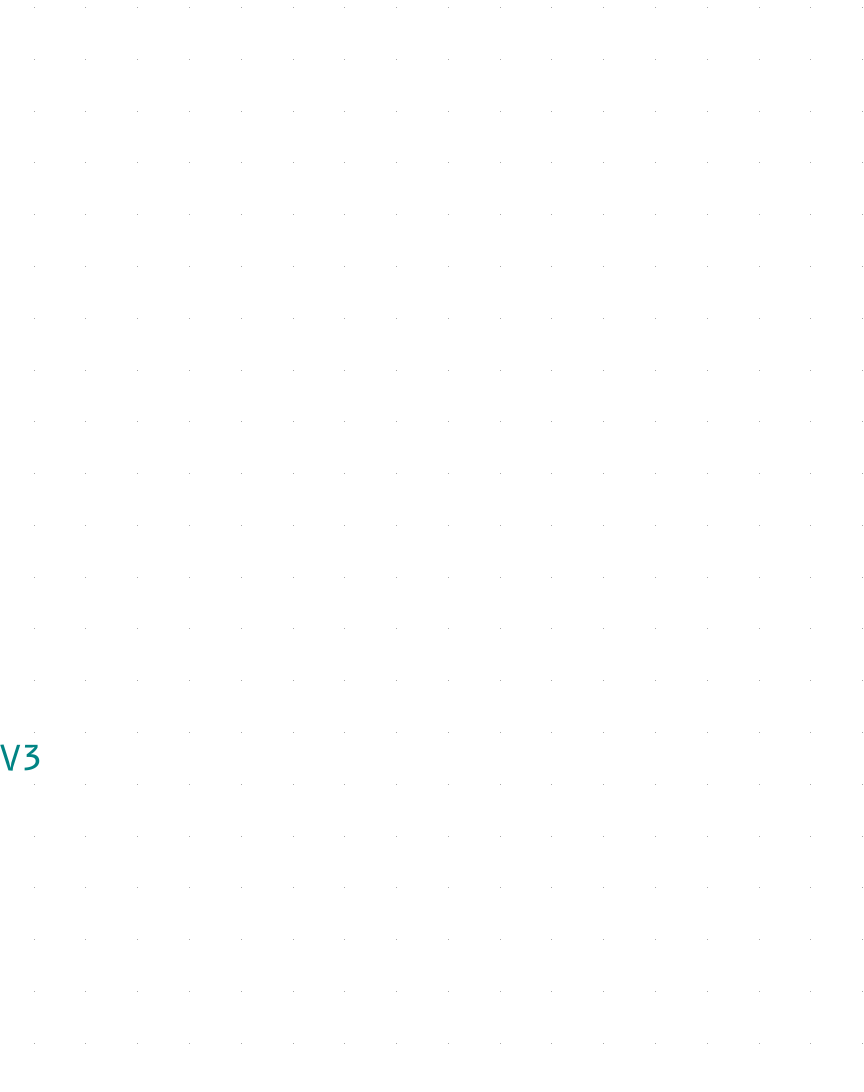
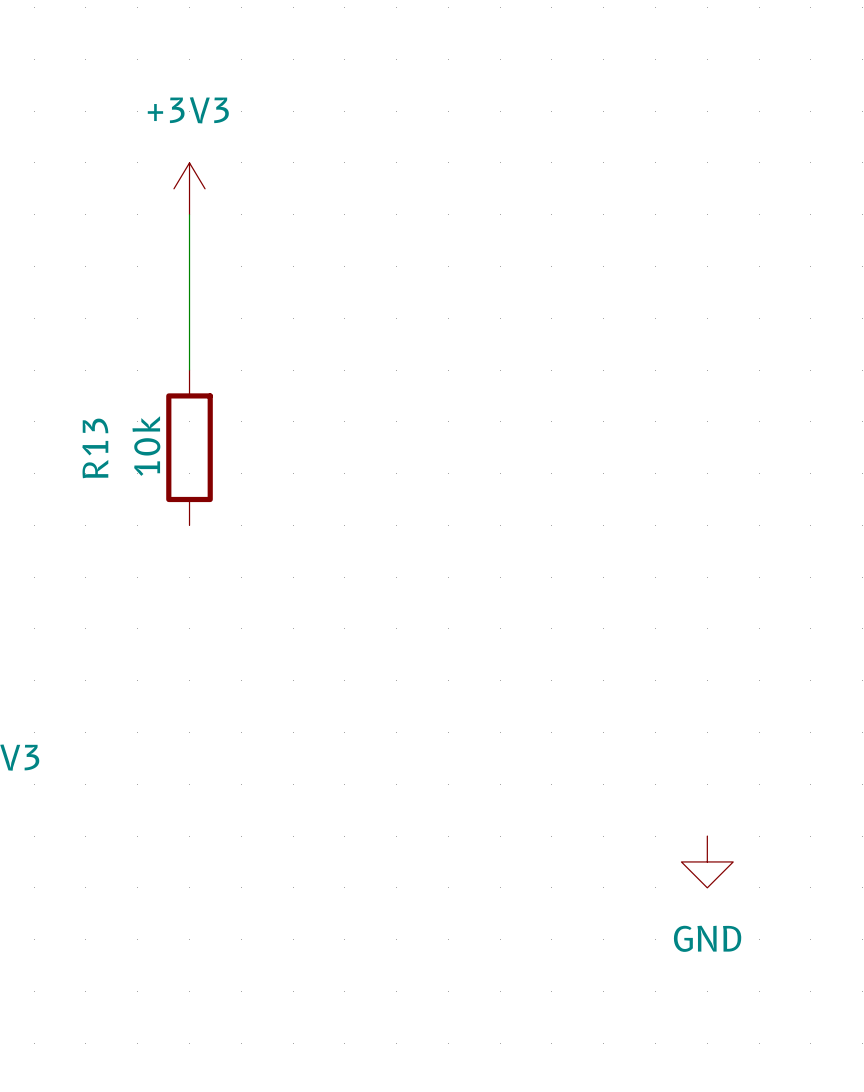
power symbol: none -> +3V3 (189, 188)
wire: none -> (189, 214) (189, 370)
R13: none -> 10k (189, 447)
power symbol: none -> GND (707, 861)

